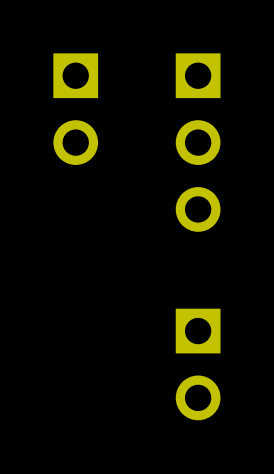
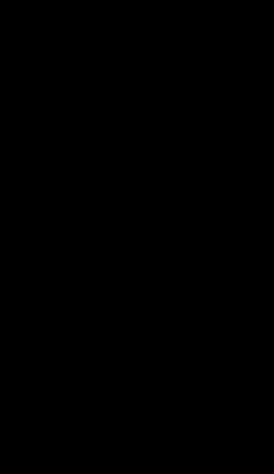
part: (75, 109) -> none
part: (198, 142) -> none
part: (198, 364) -> none

